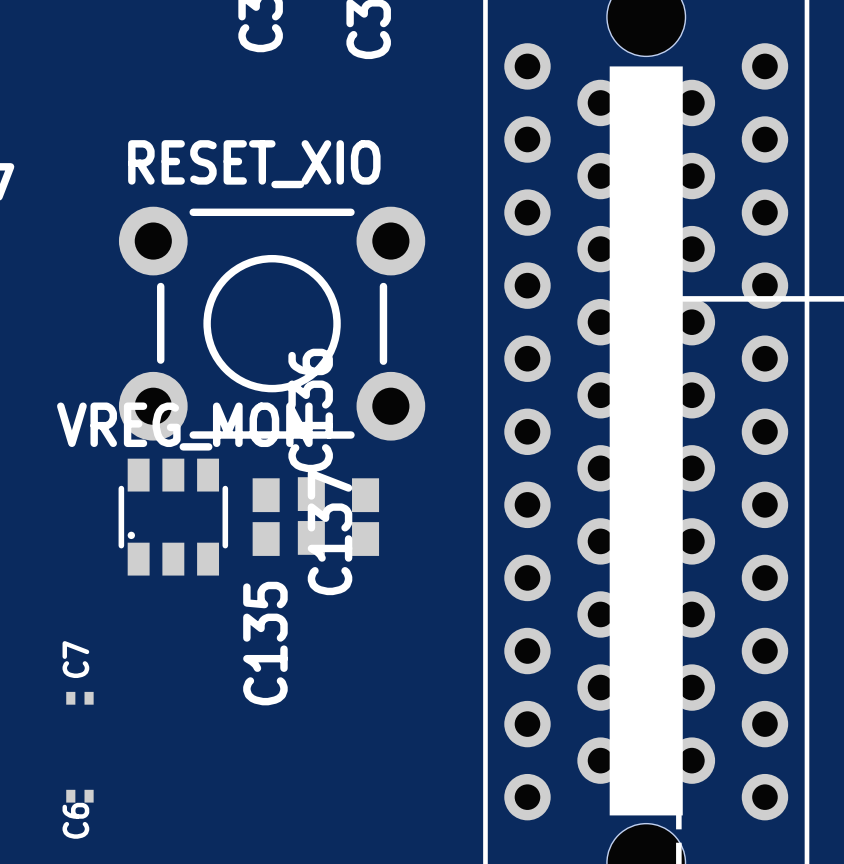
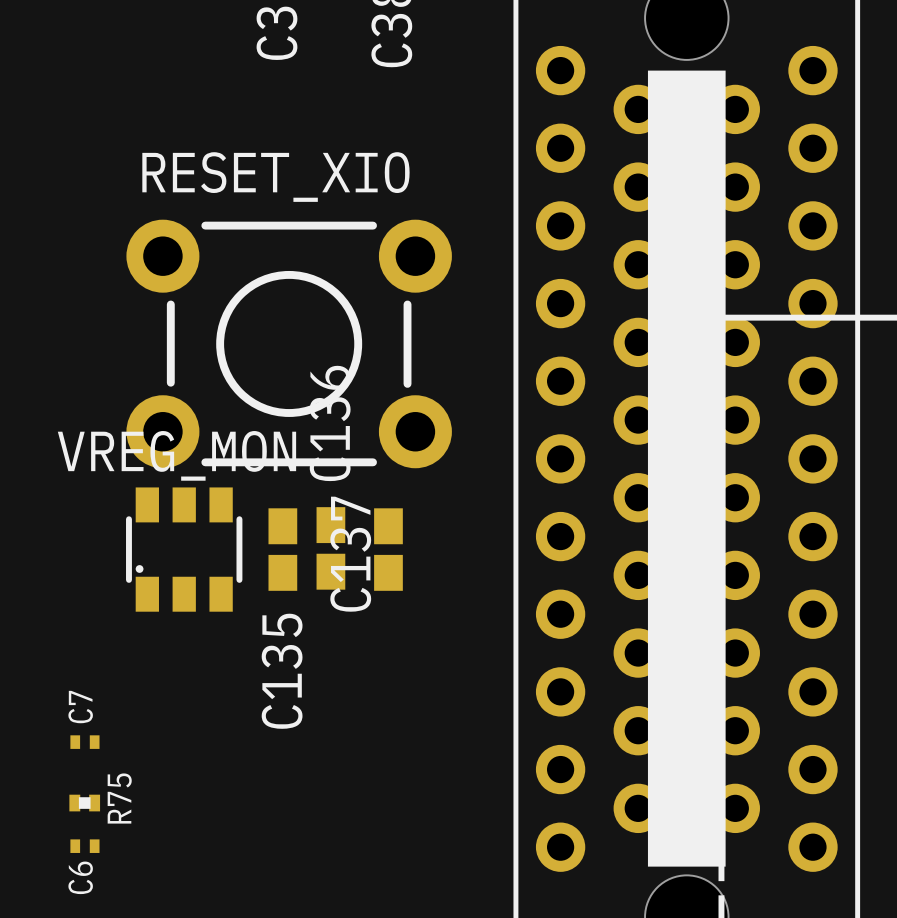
R75: none -> (84, 803)

